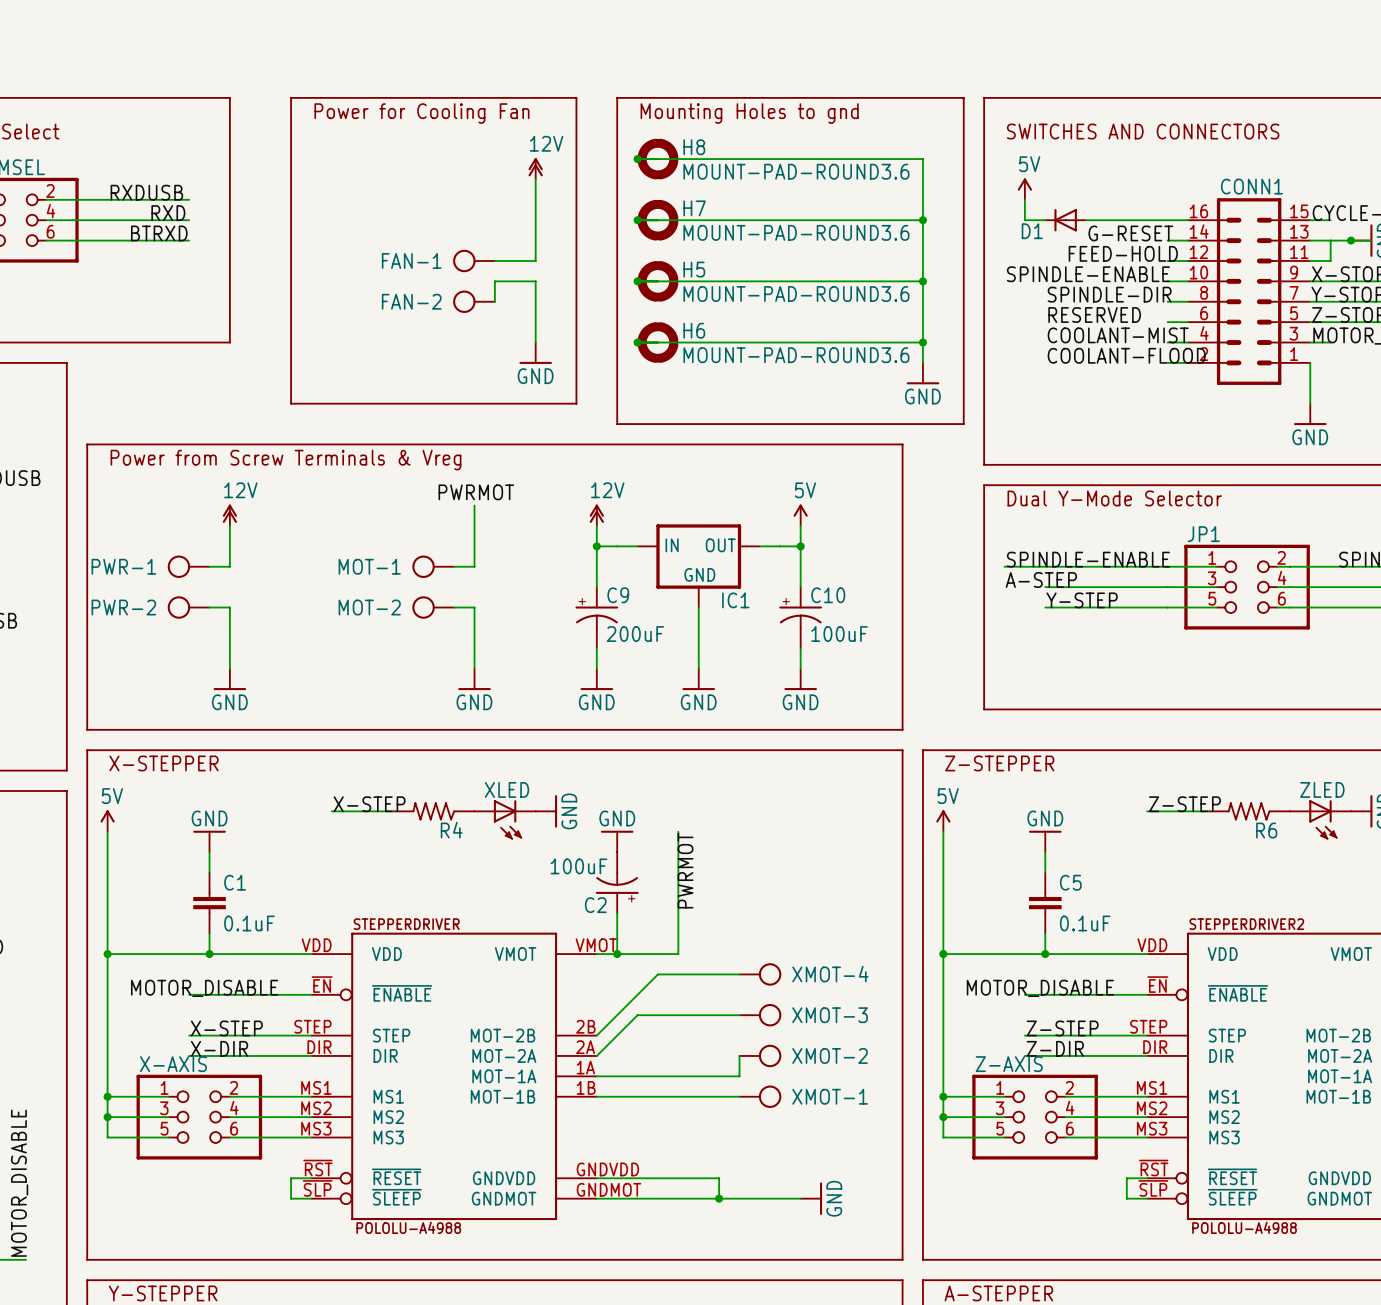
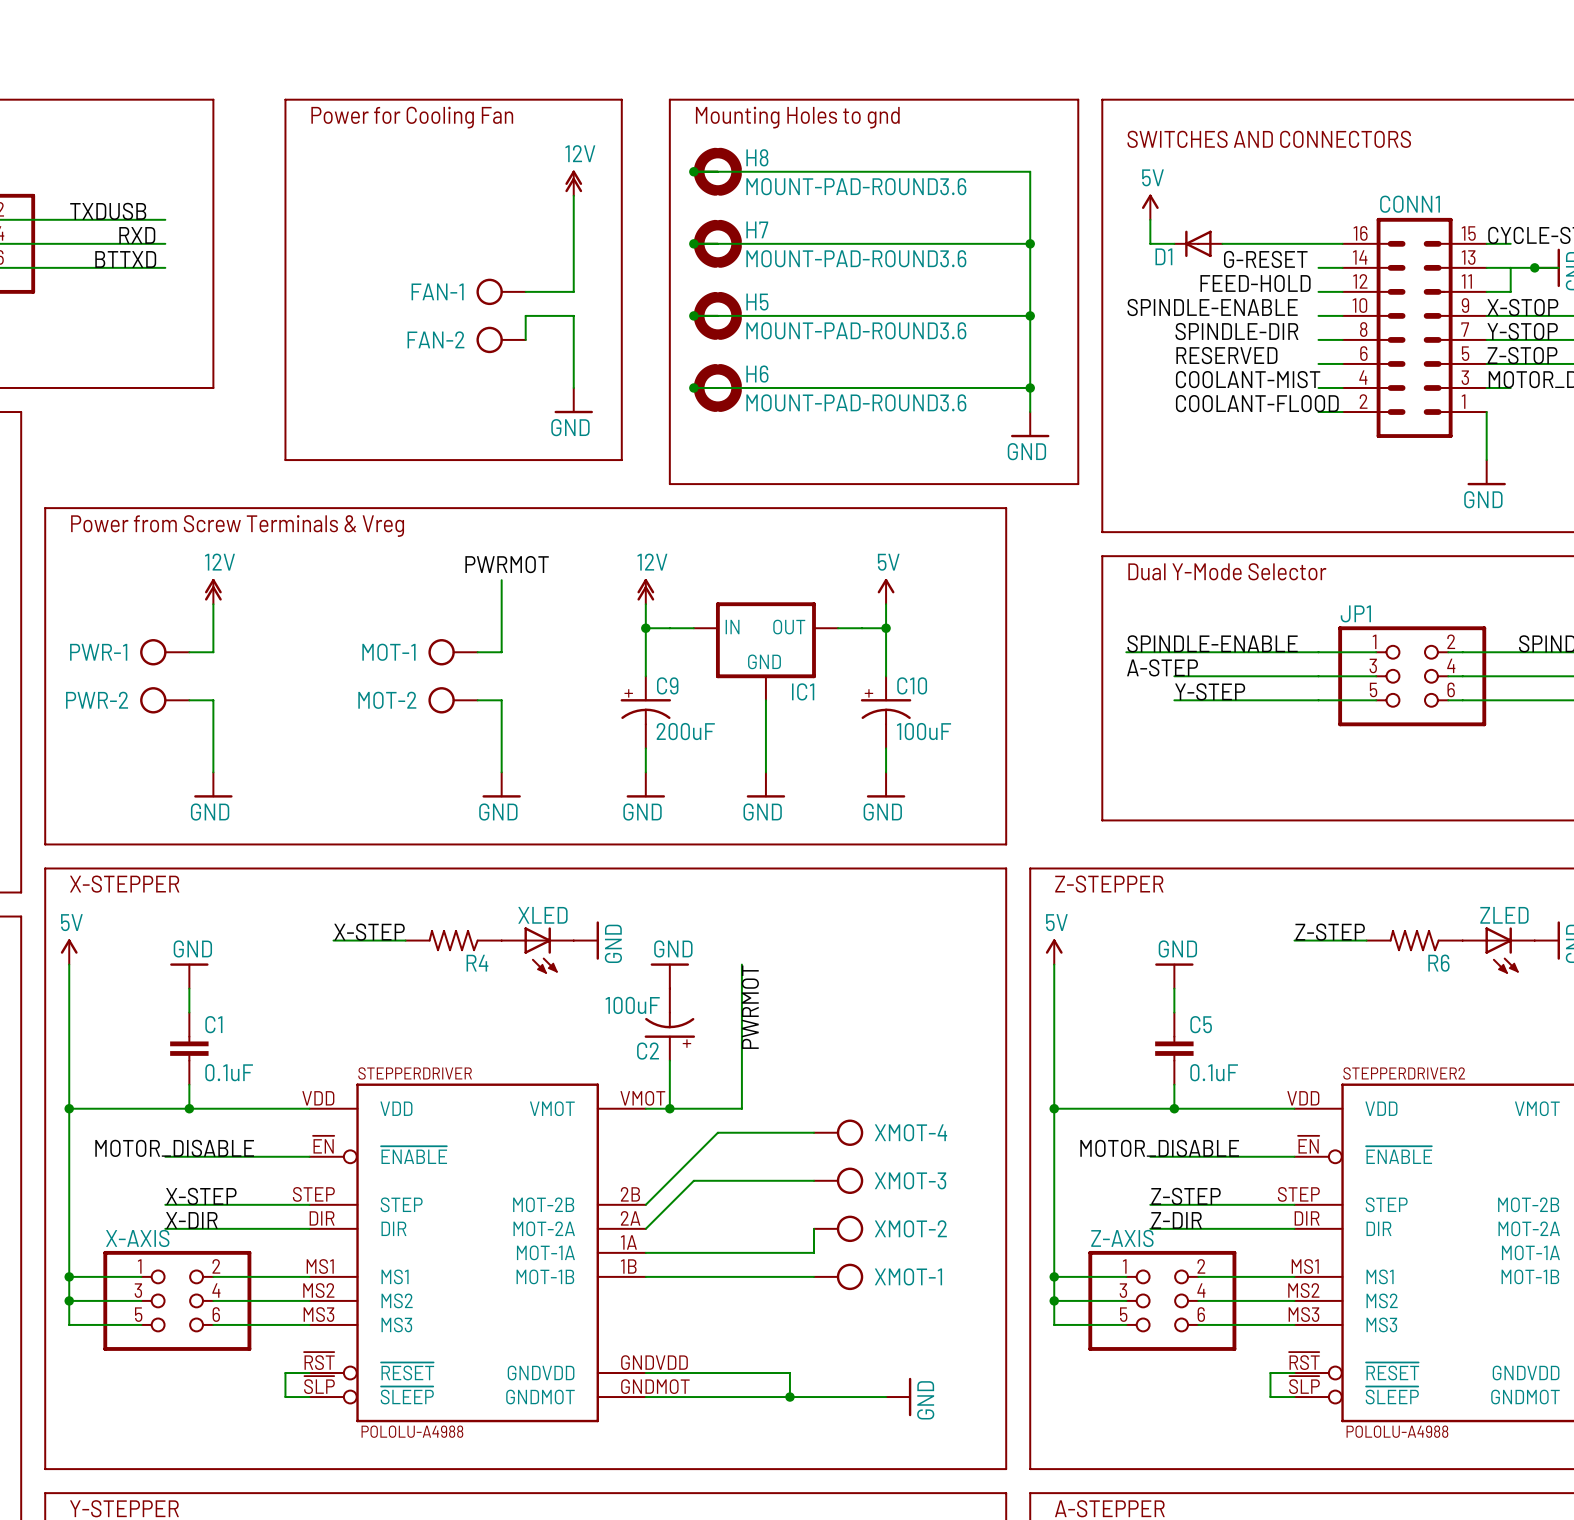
label: RXDUSB (146, 192) -> TXDUSB (108, 211)
label: BTRXD (159, 233) -> BTTXD (125, 259)

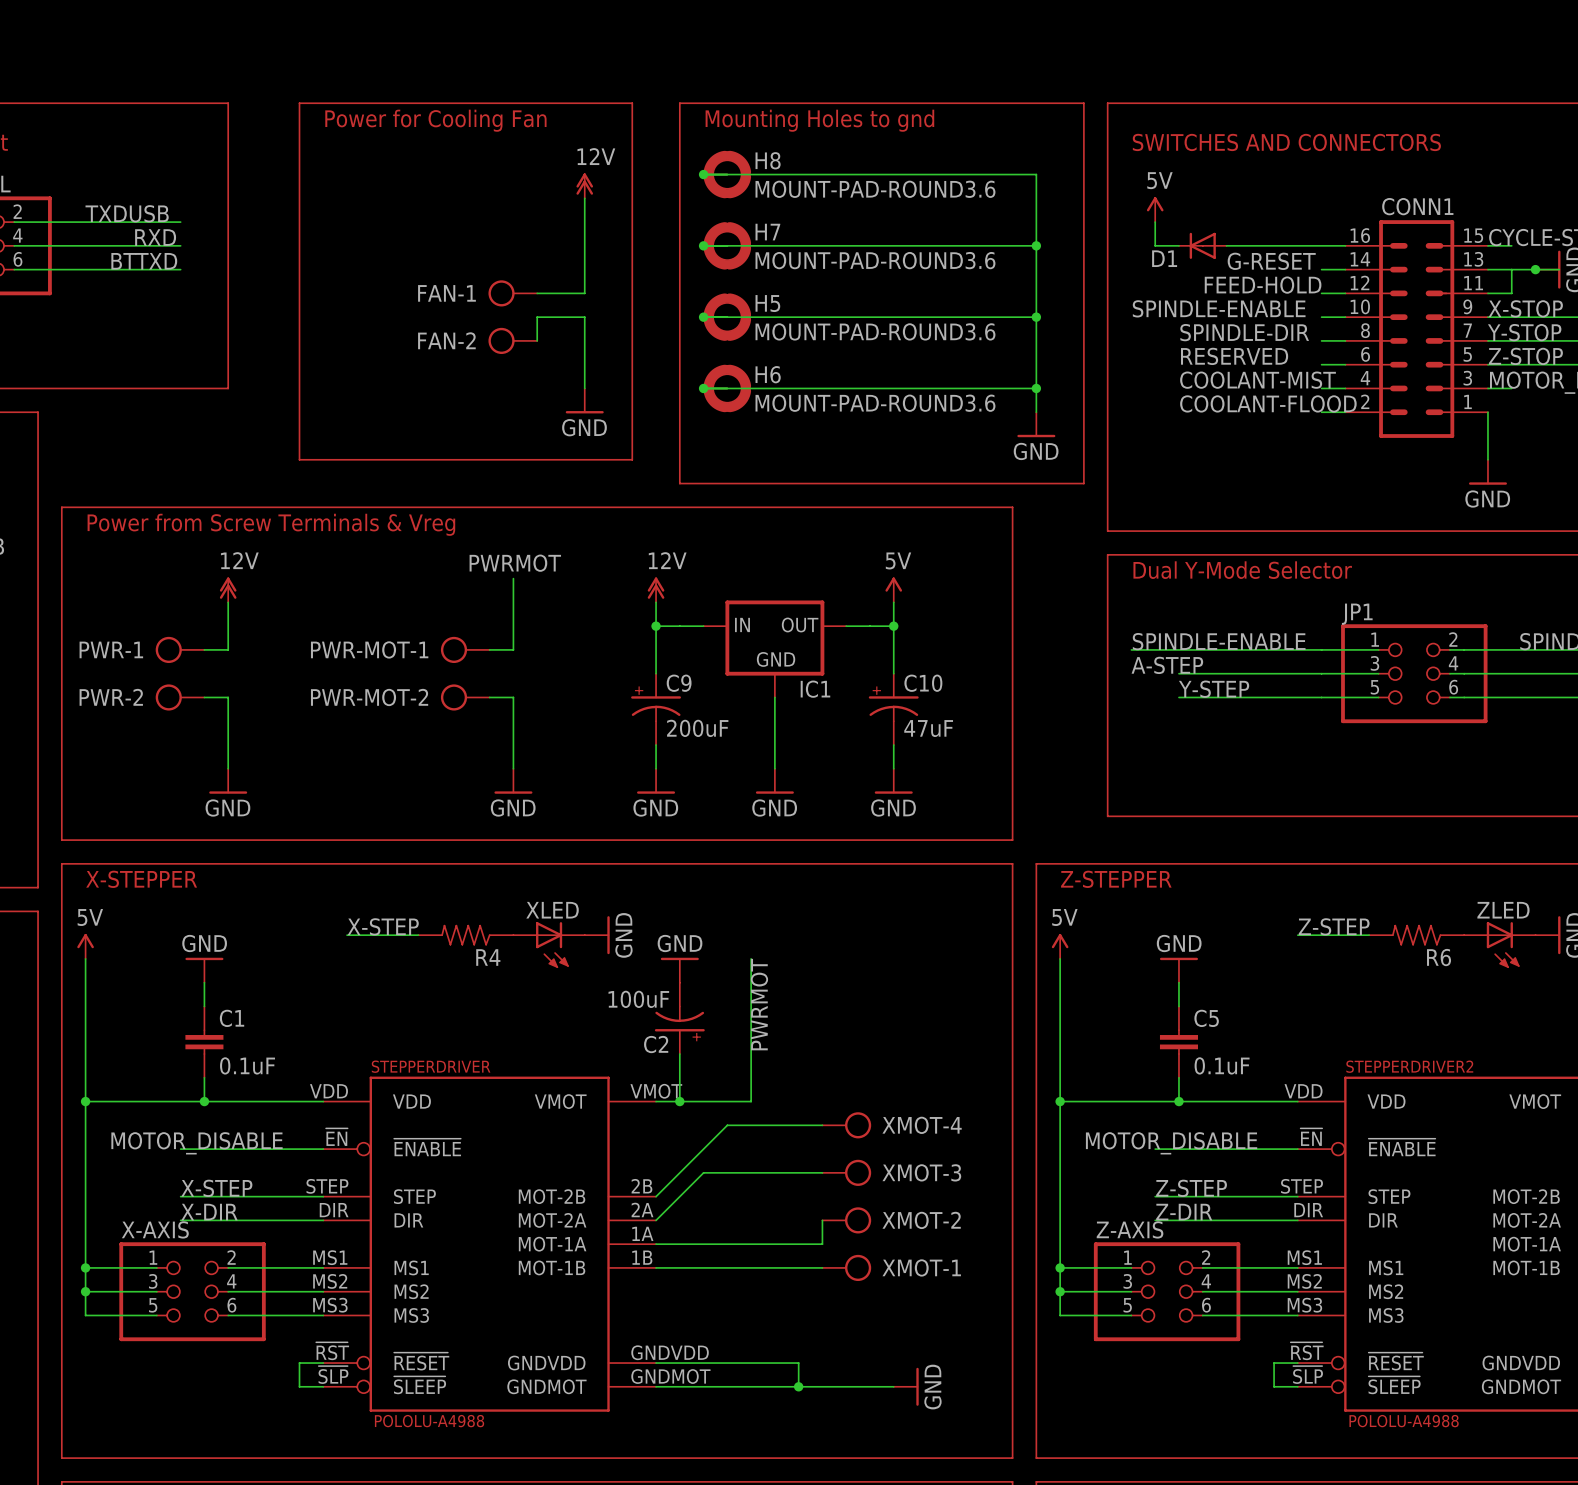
MOT-1 name: MOT-1 (388, 652) -> PWR-MOT-1 (369, 649)
MOT-2 name: MOT-2 (387, 700) -> PWR-MOT-2 (369, 697)
C10 value: 100uF (924, 731) -> 47uF (928, 728)

